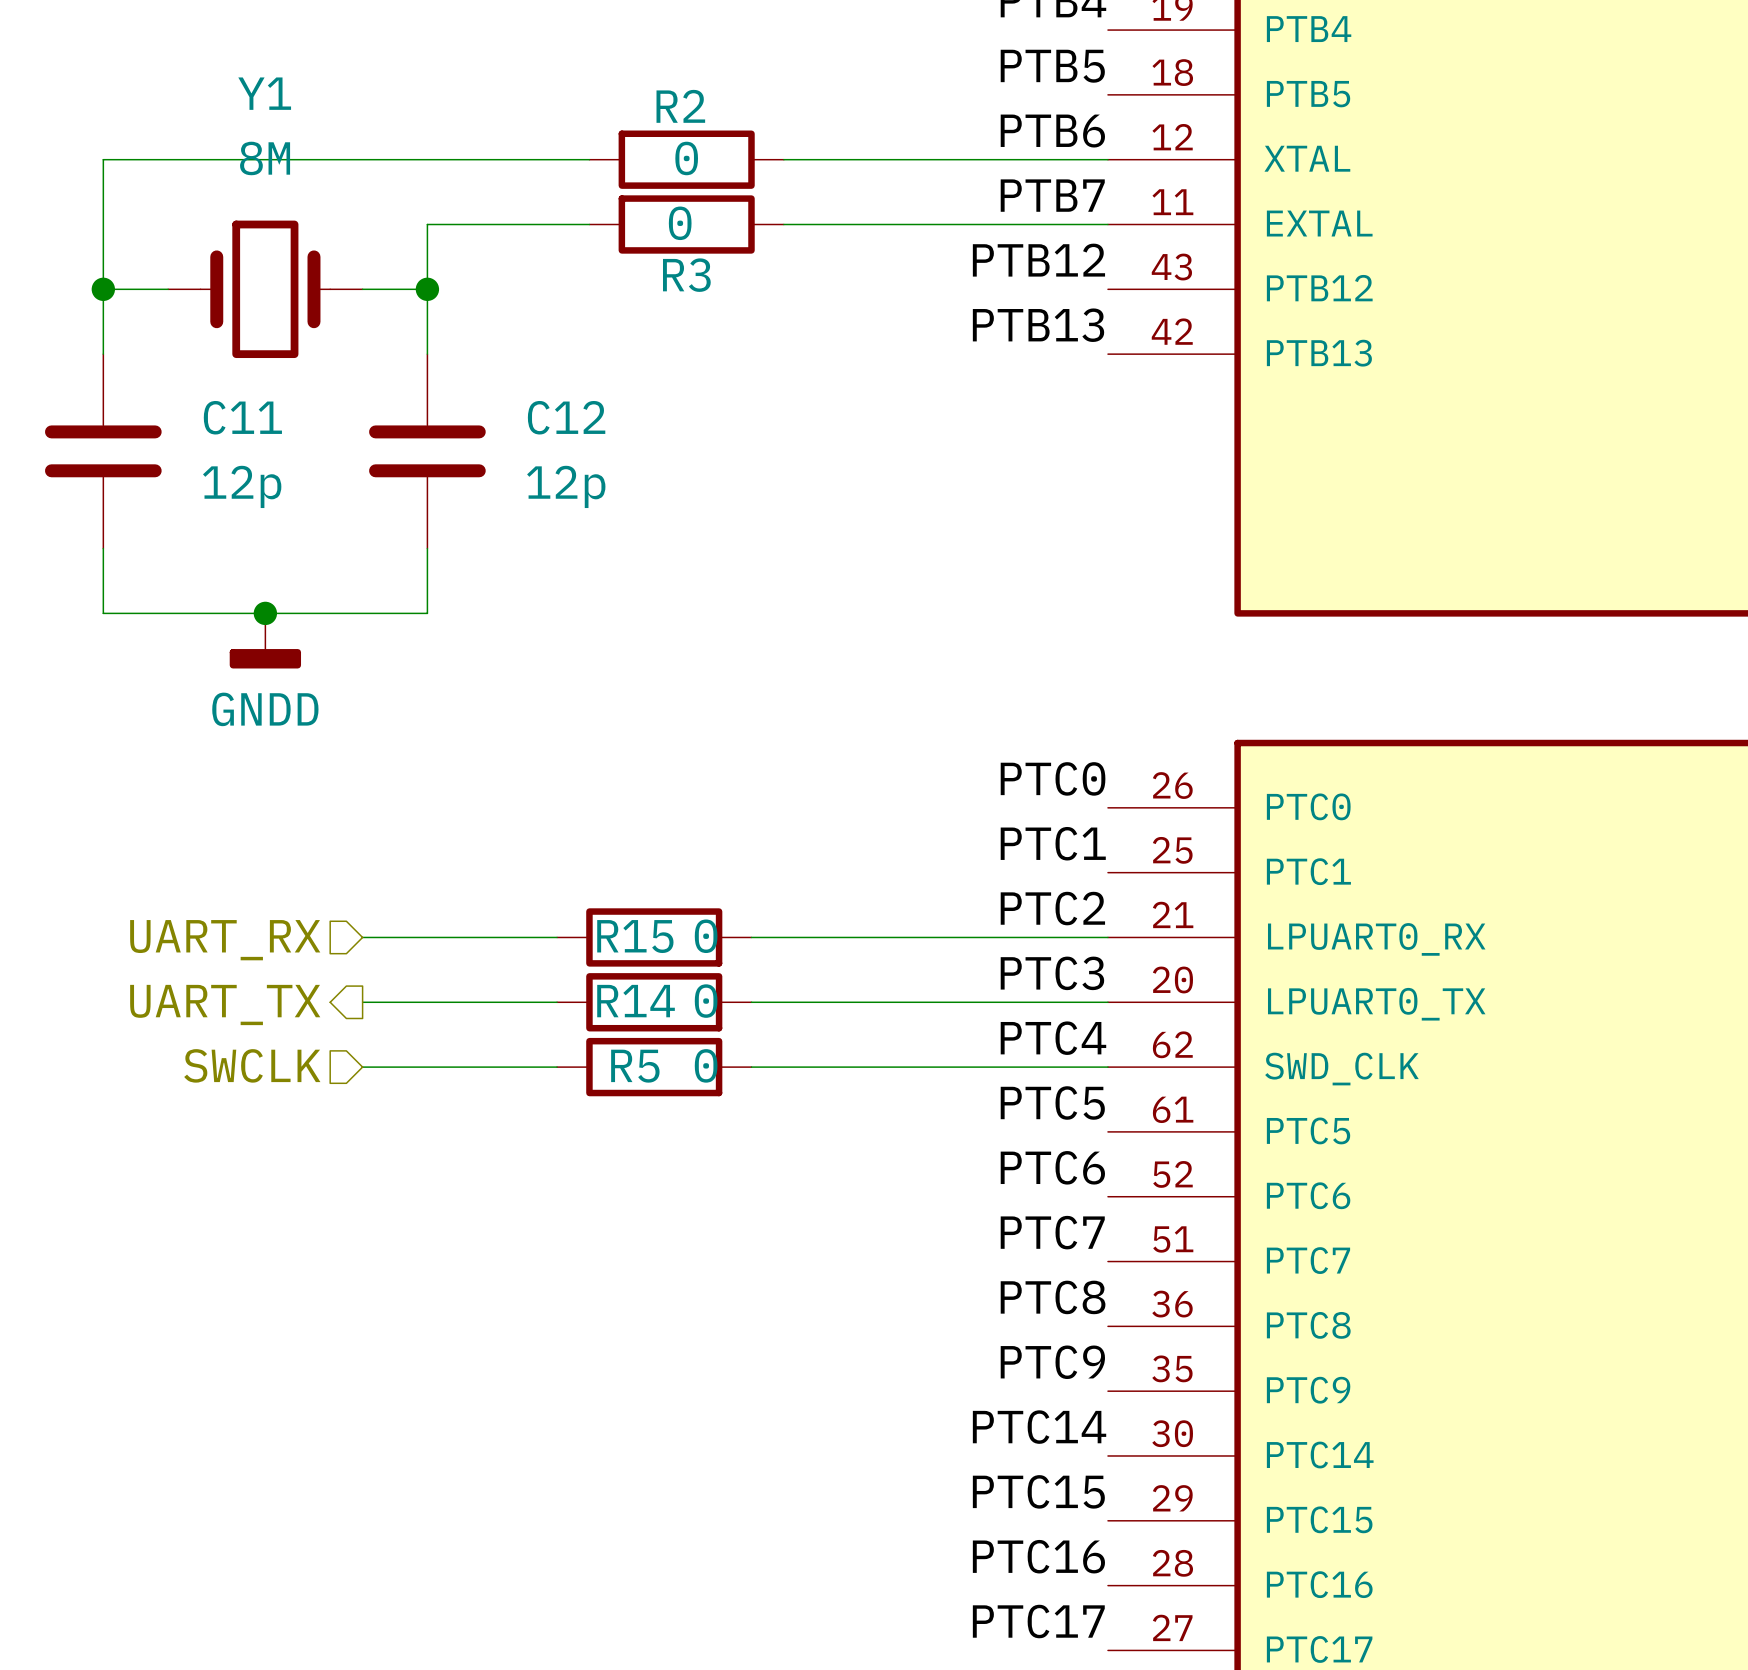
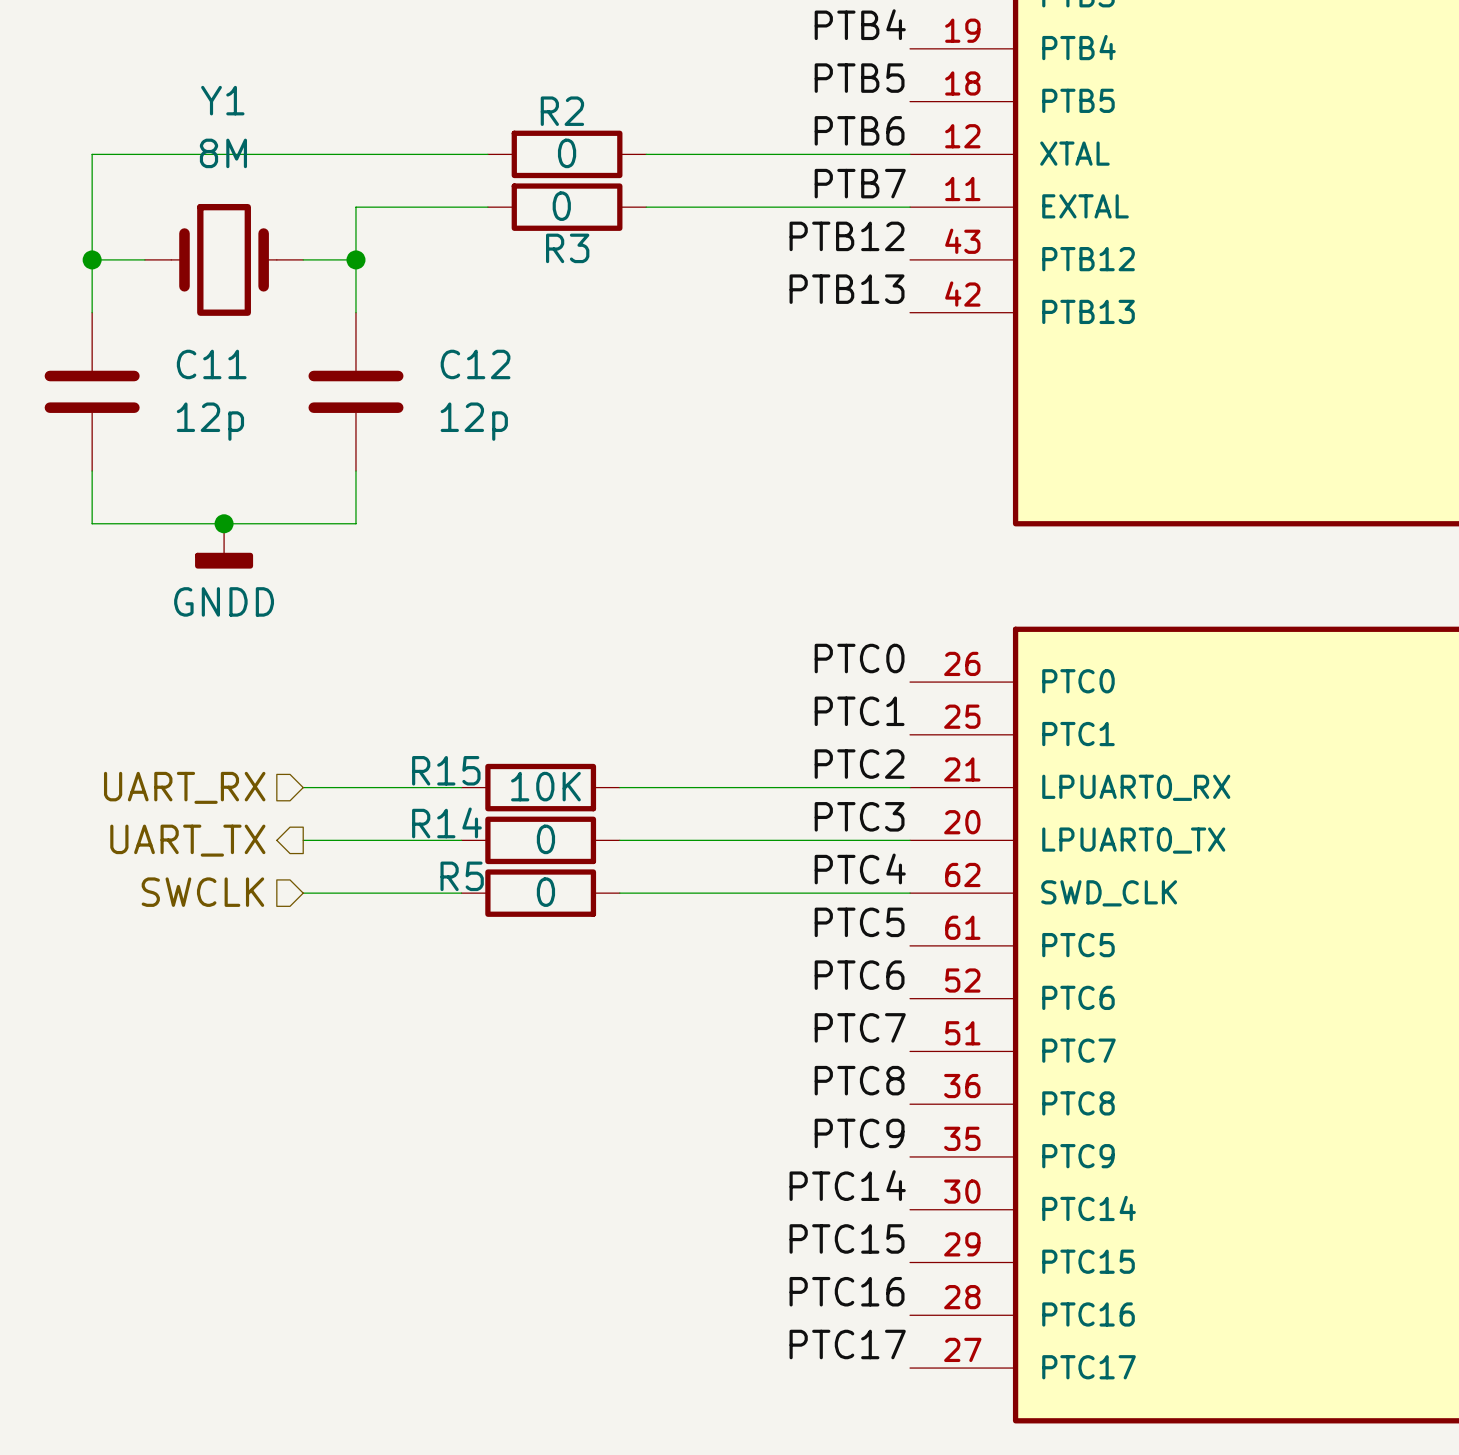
R15 name position: R15 (635, 936) -> R15 (446, 770)
R15 value: 0 (706, 936) -> 10K (545, 786)
R14 name position: R14 (636, 1001) -> R14 (446, 822)
R14 value position: 0 (706, 1001) -> 0 (545, 839)
R5 value position: 0 (706, 1065) -> 0 (545, 892)
R5 name position: R5 (635, 1066) -> R5 (462, 876)

